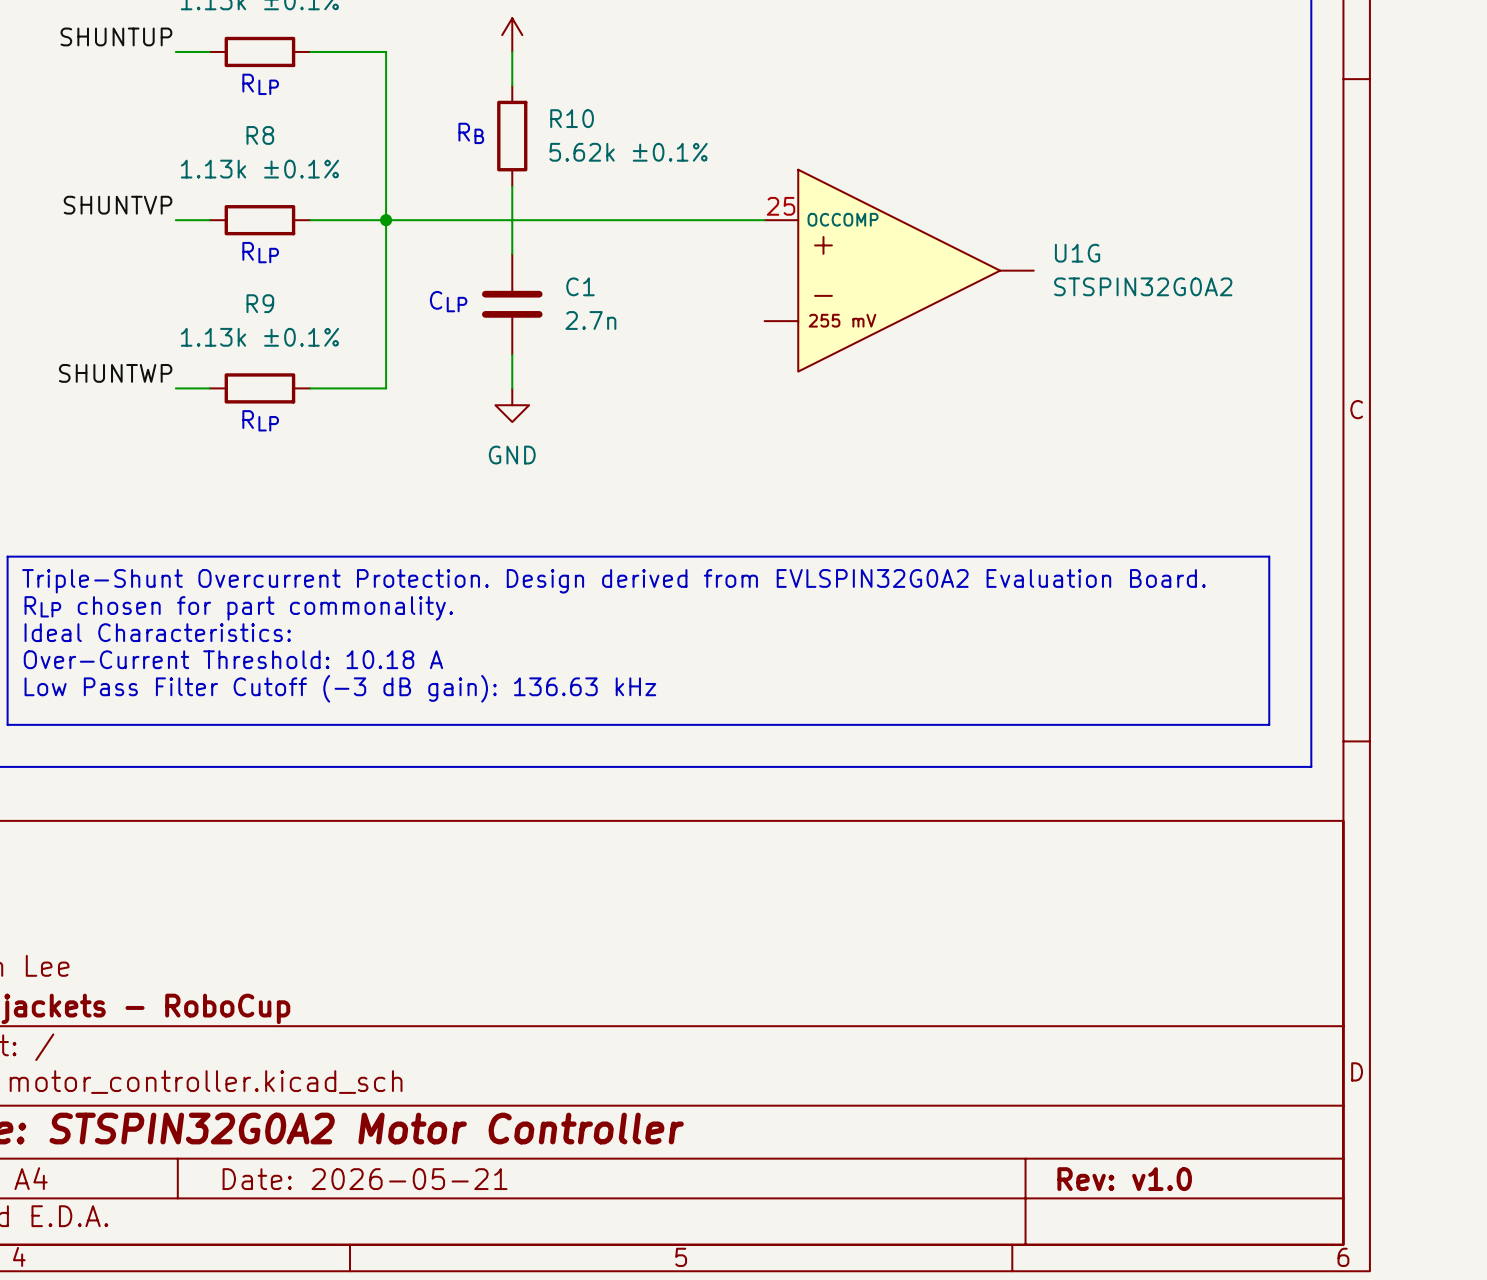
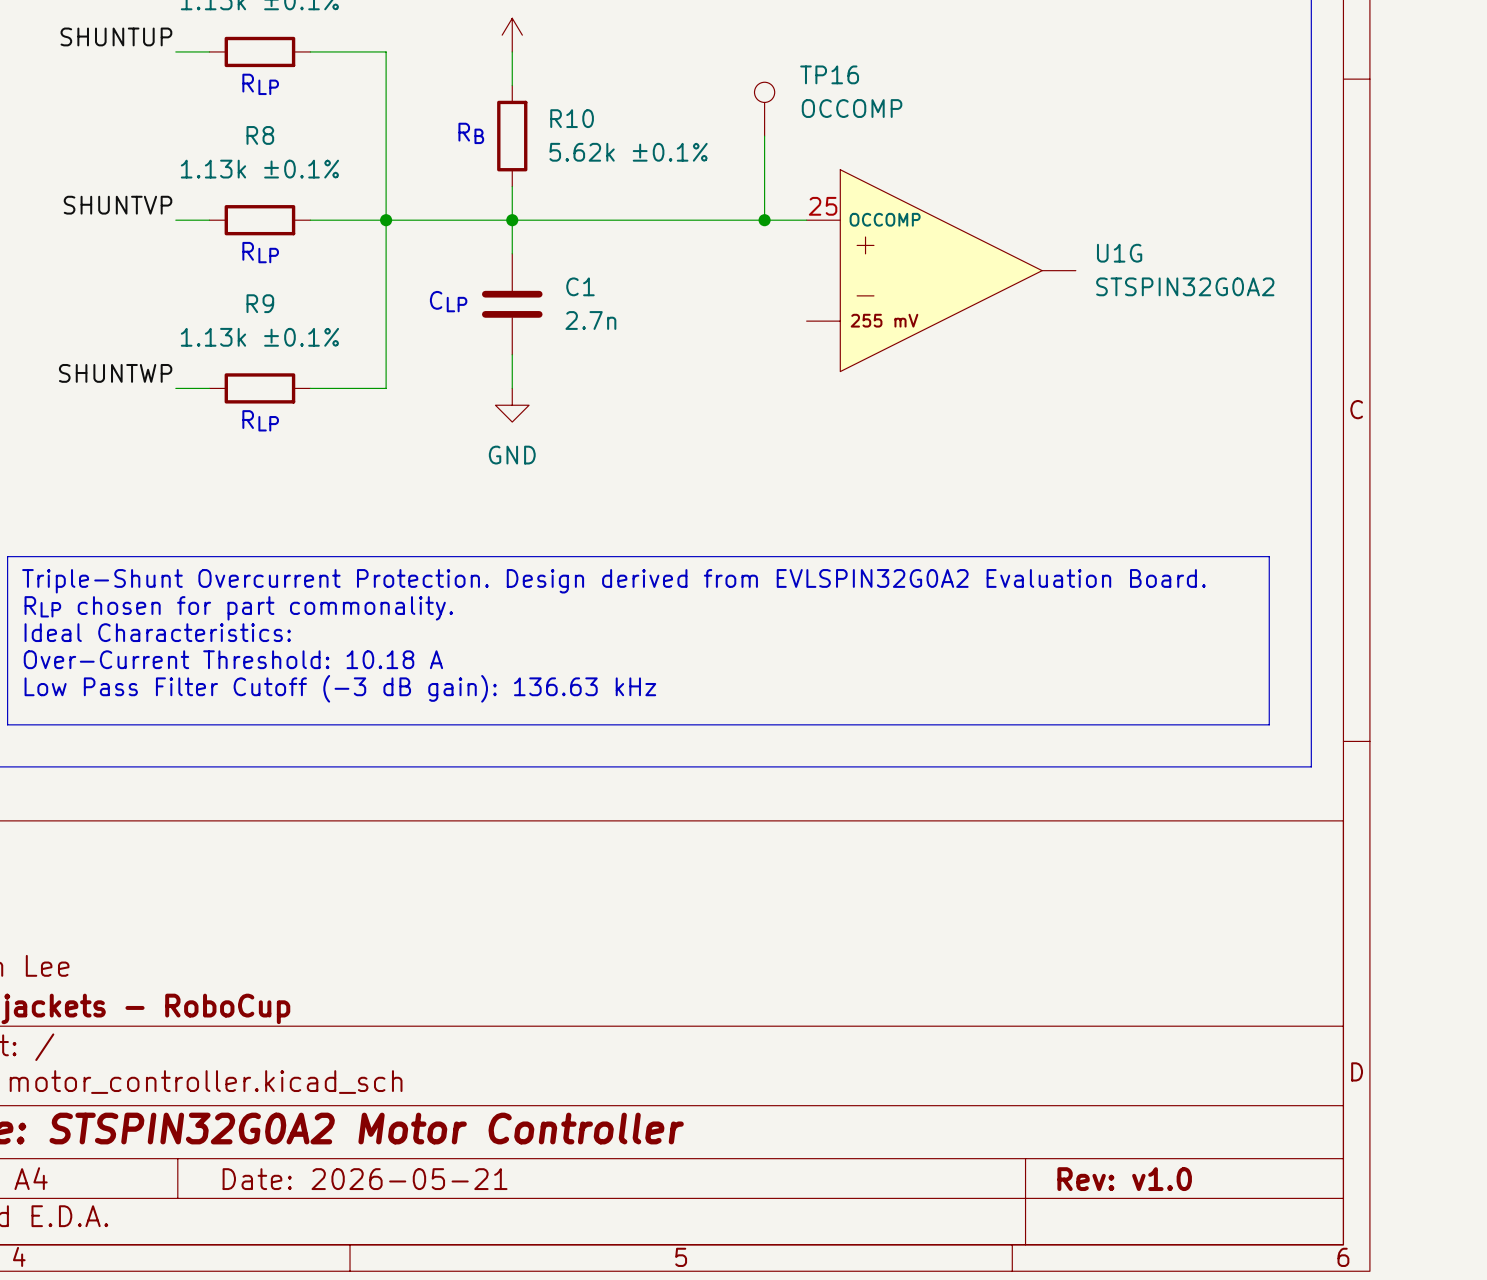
TP16: none -> OCCOMP (764, 109)
wire: none -> (764, 136) (764, 220) (806, 220)
junction: none -> (512, 220)
junction: none -> (764, 220)
U1G position: (899, 270) -> (941, 270)

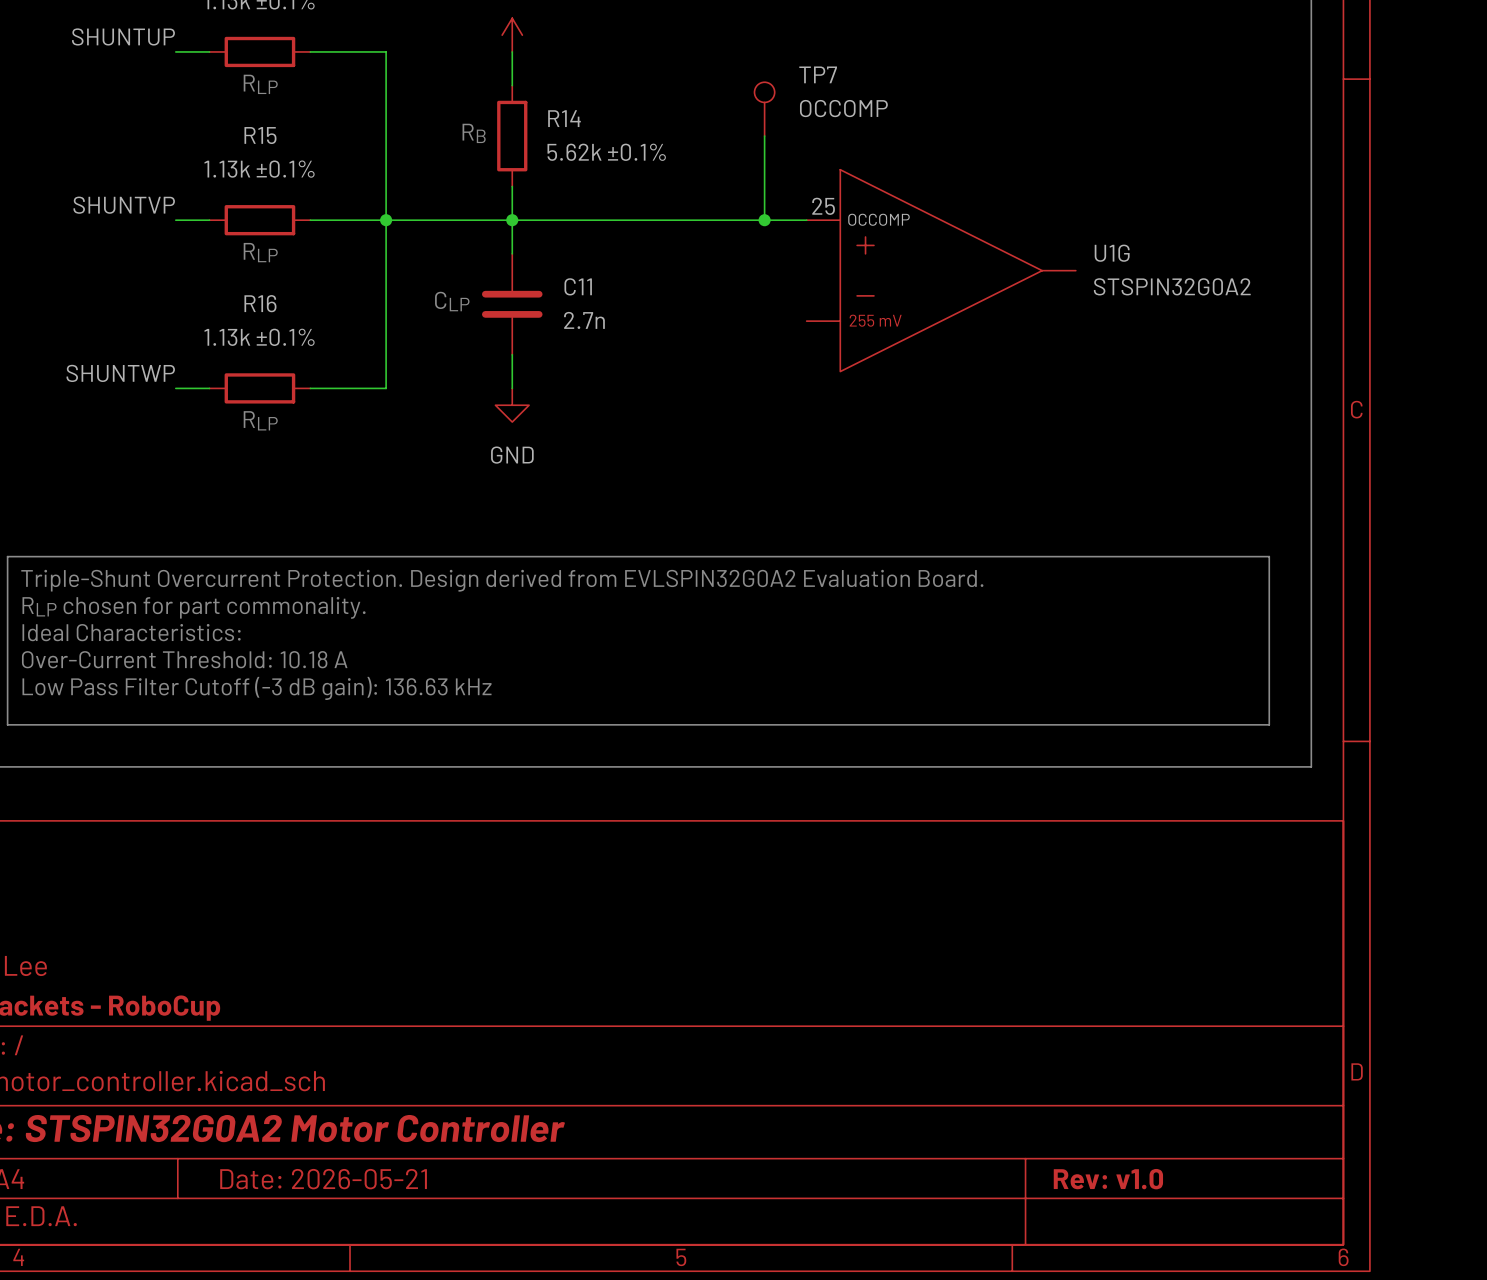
TP16 name: TP16 (829, 74) -> TP7 (818, 74)
R10 name: R10 (572, 118) -> R14 (564, 118)
R8 name: R8 (260, 135) -> R15 (260, 135)
C1 name: C1 (580, 286) -> C11 (578, 286)
R9 name: R9 (260, 303) -> R16 (260, 303)

